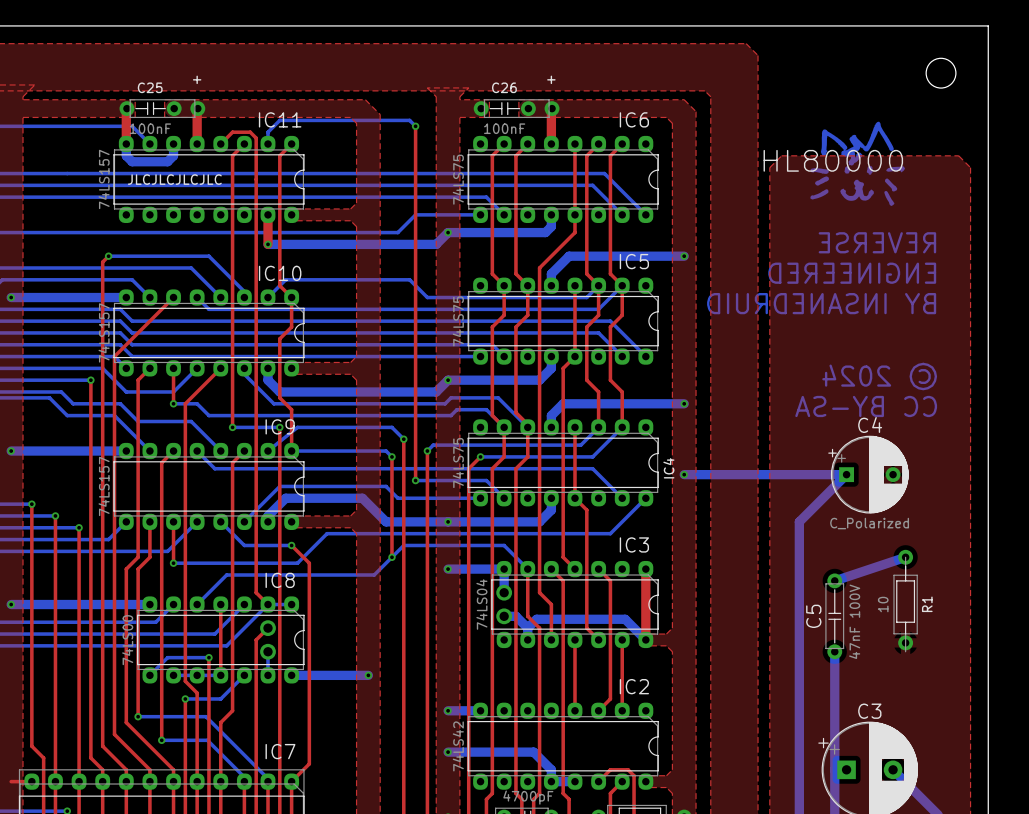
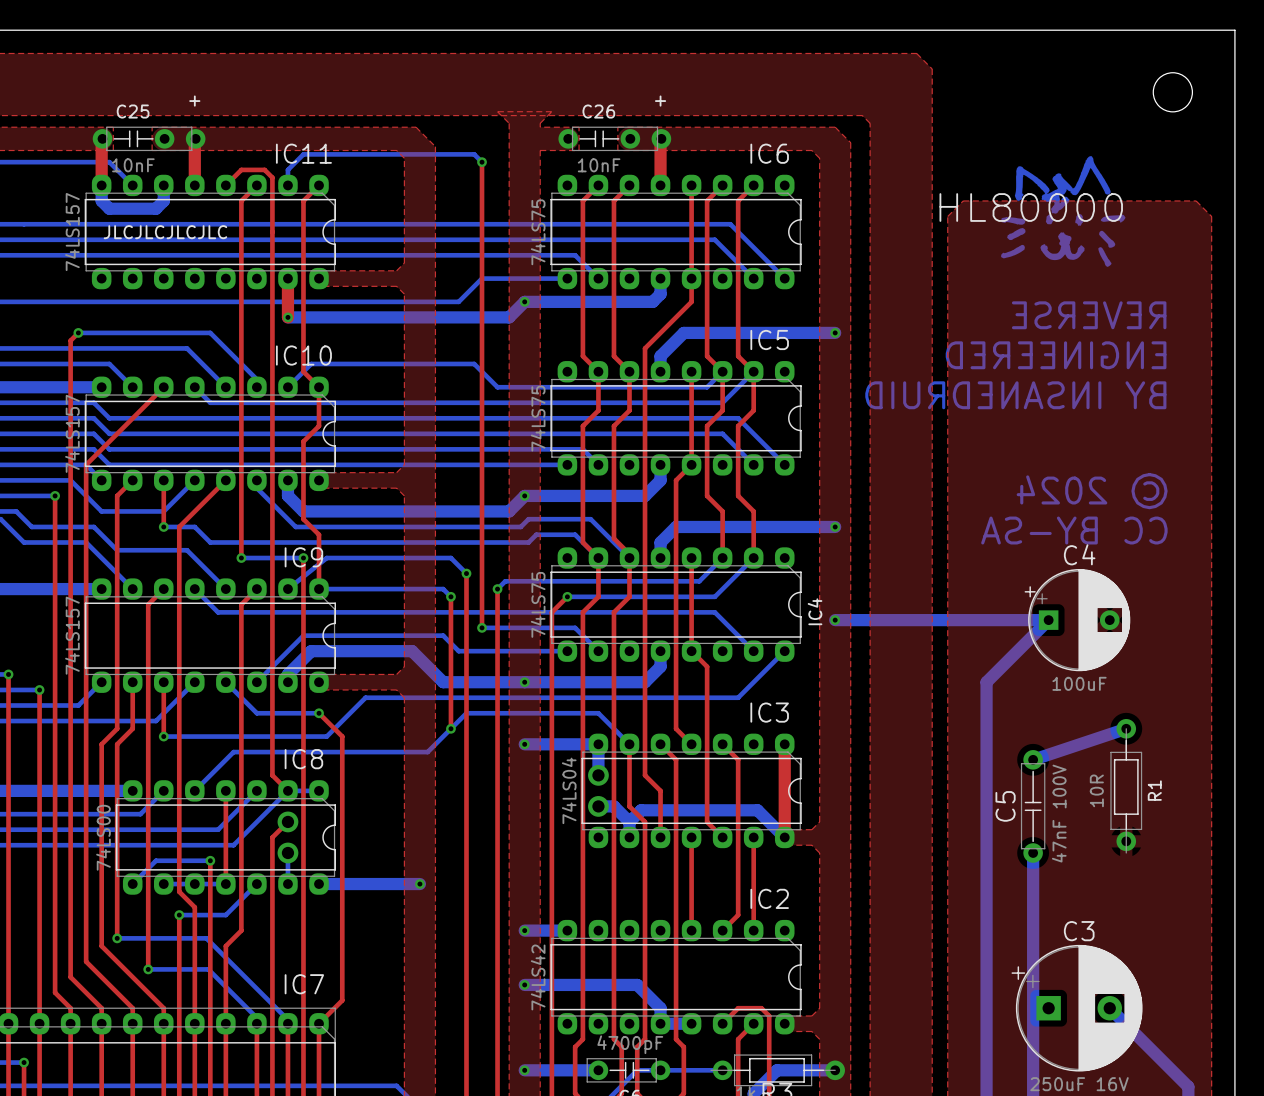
C25 value: 100nF (150, 128) -> 10nF (133, 165)
C26 value: 100nF (504, 128) -> 10nF (599, 165)
C4 value: C_Polarized (869, 523) -> 100uF (1079, 683)
R1 value: 10 (883, 604) -> 10R (1096, 790)

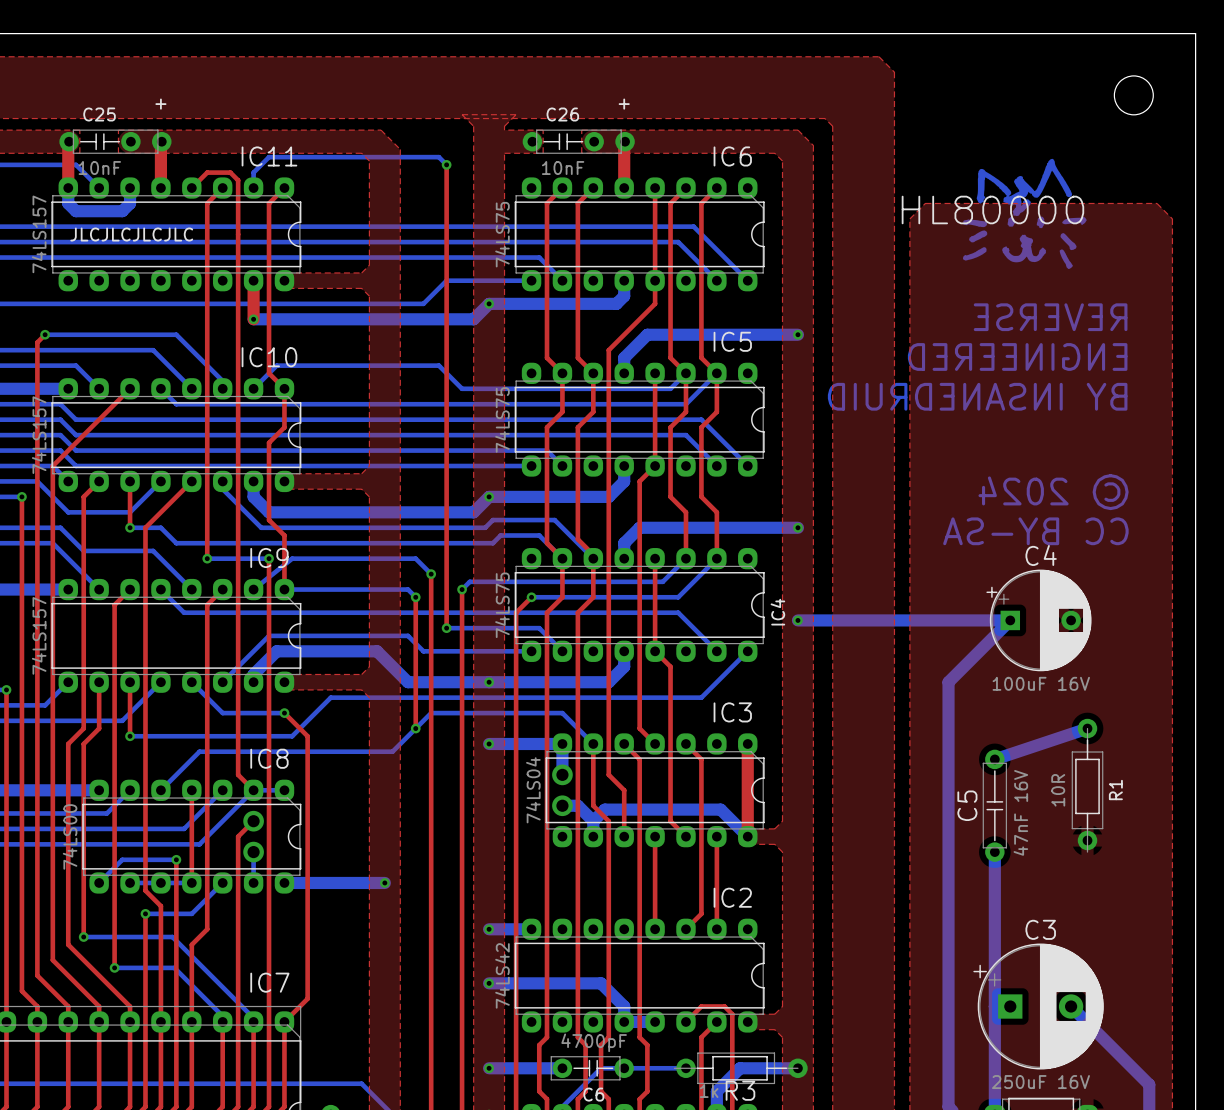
C4 value: 100uF (1079, 683) -> 100uF 16V (1041, 683)
C5 value: 47nF 100V (1059, 813) -> 47nF 16V (1020, 812)

